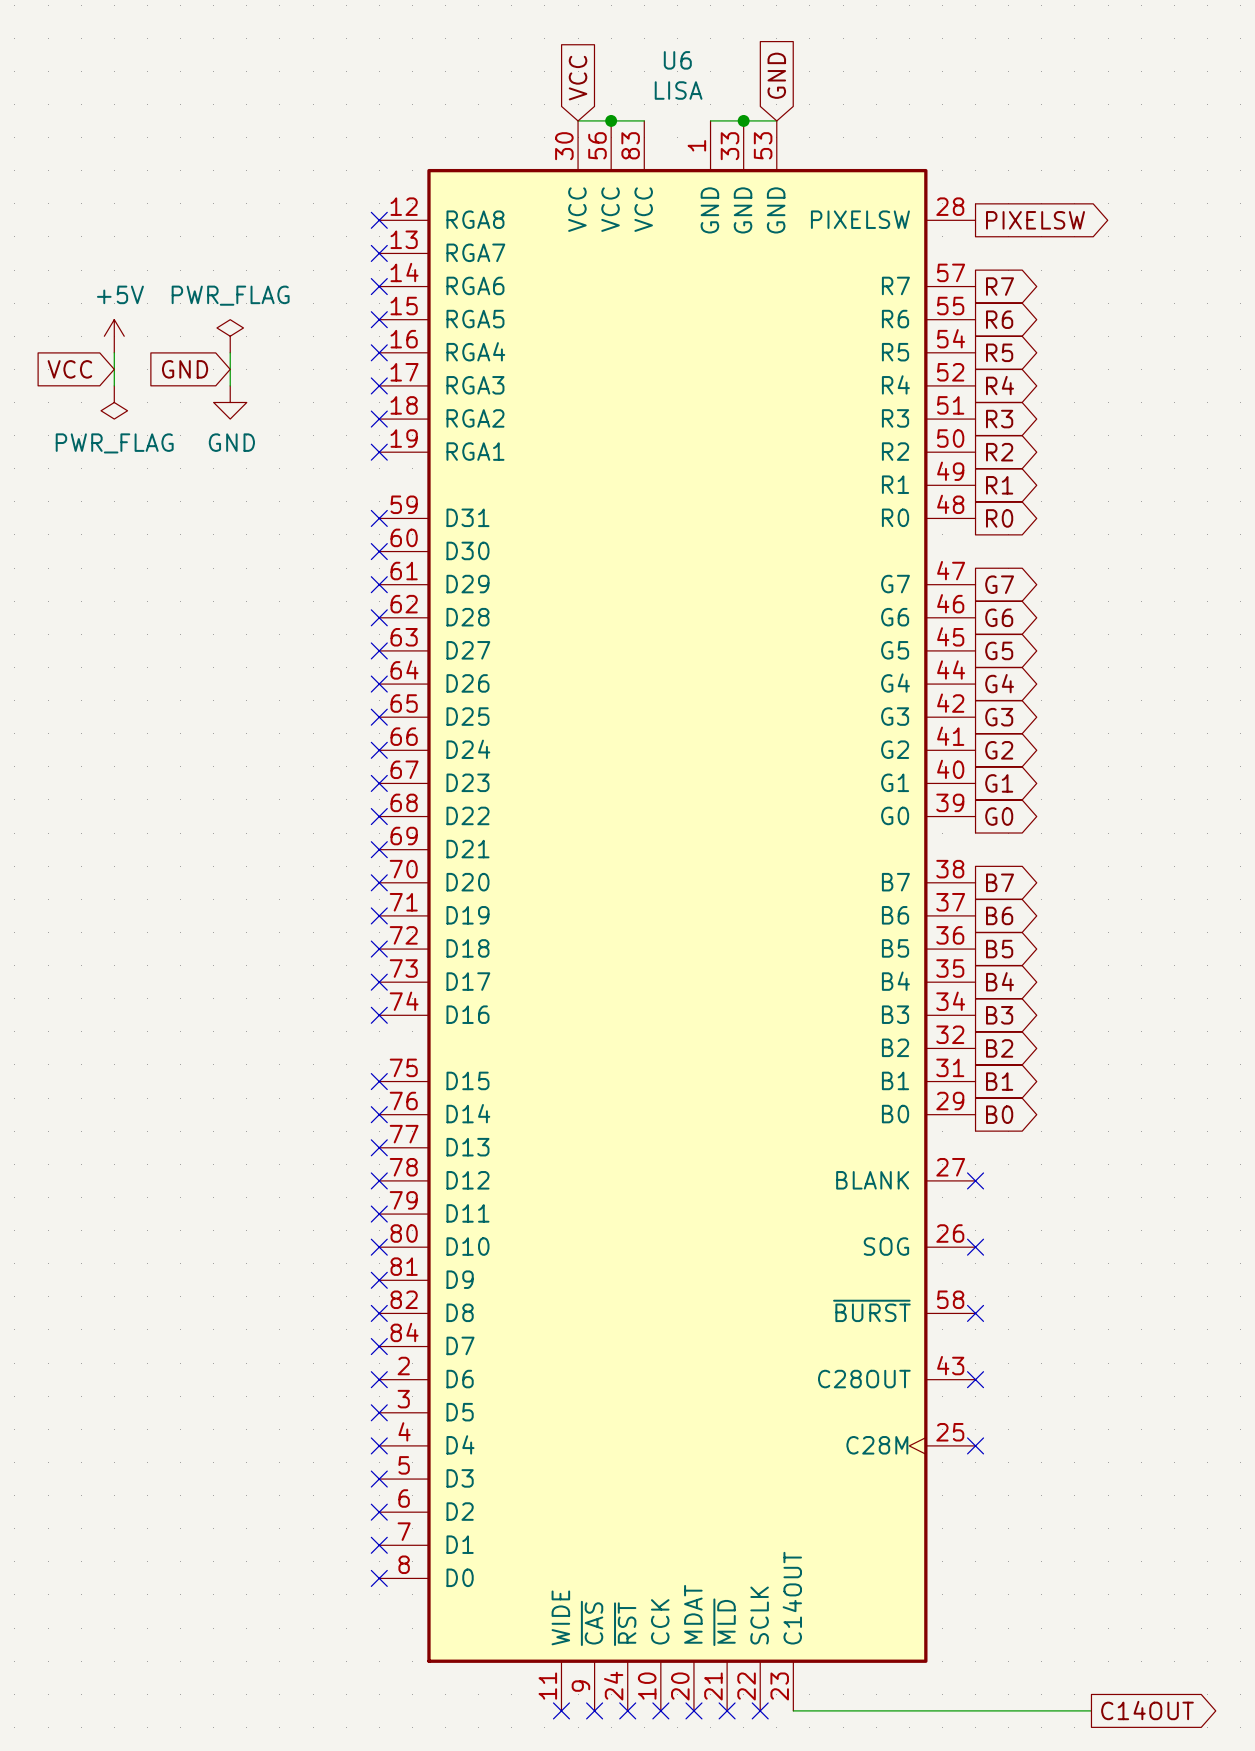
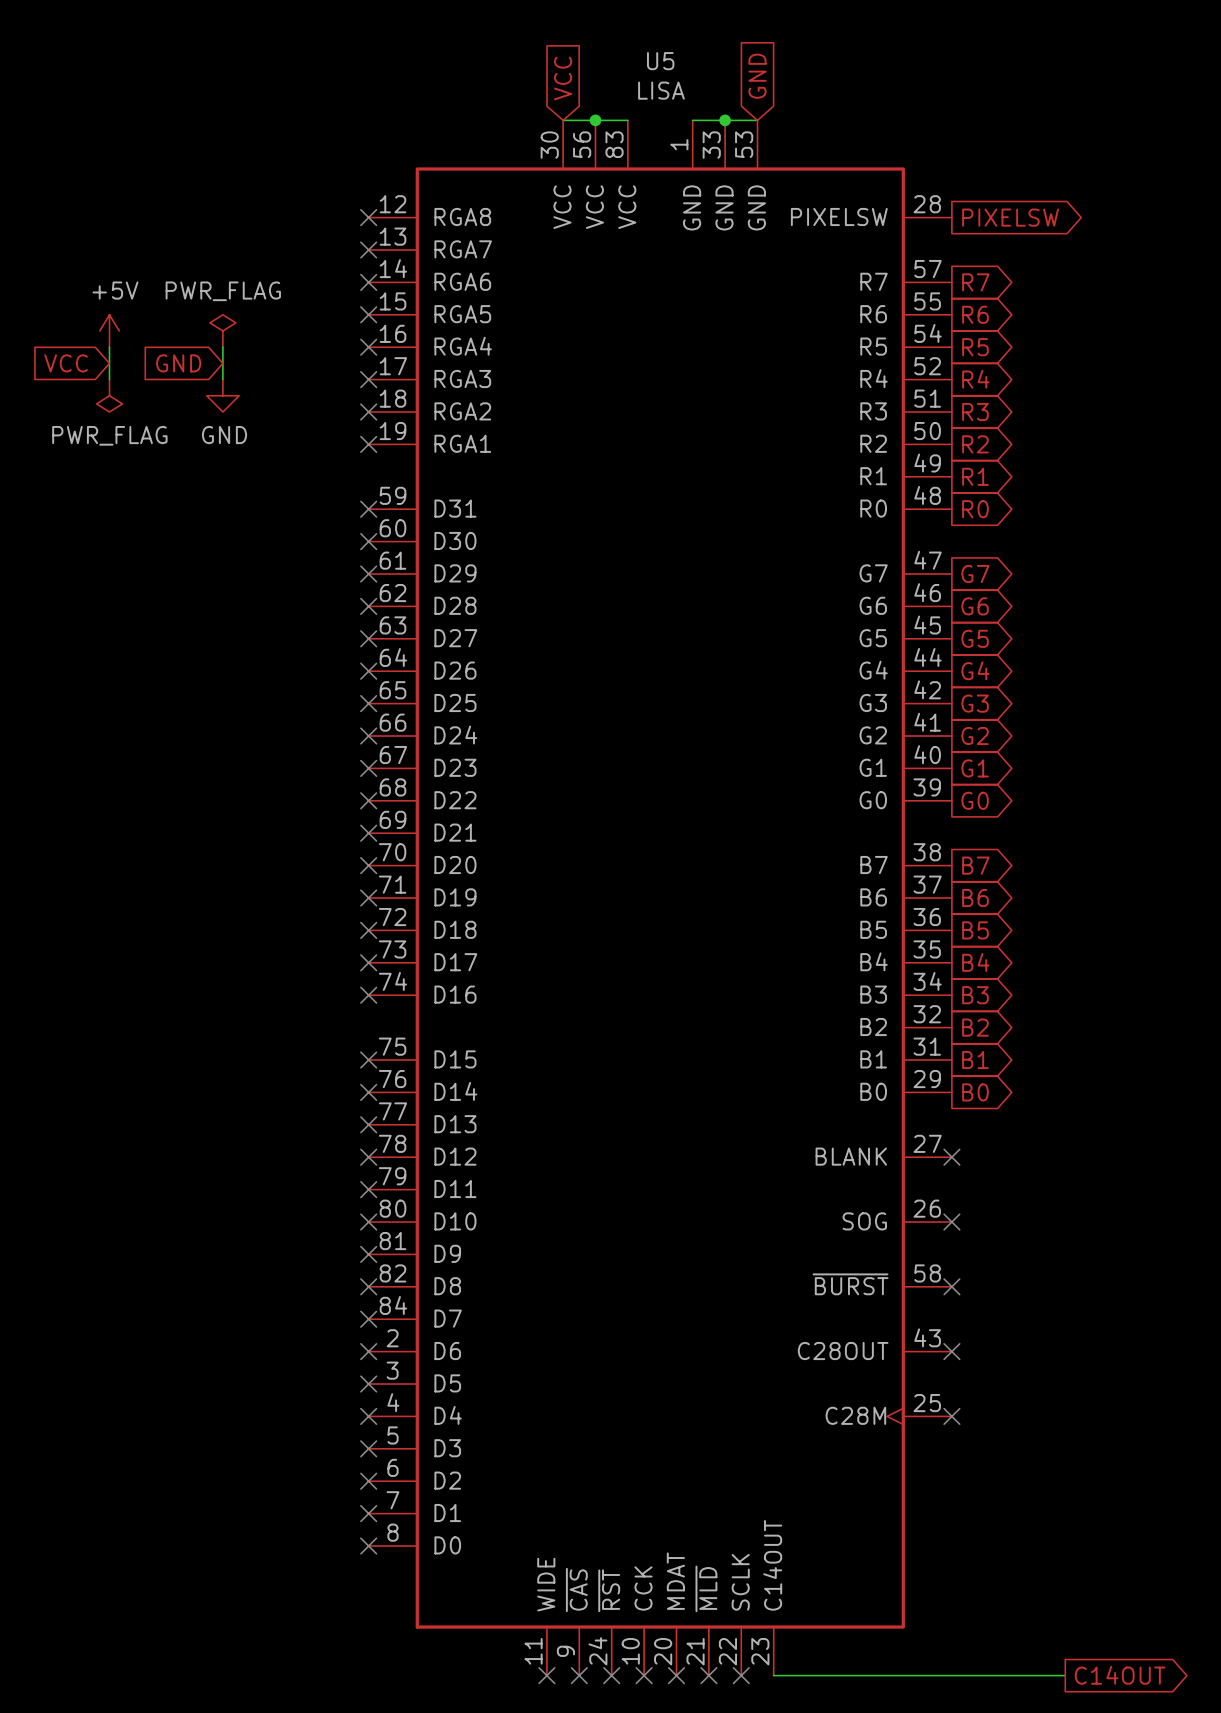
U6 name: U6 (677, 60) -> U5 (660, 61)

